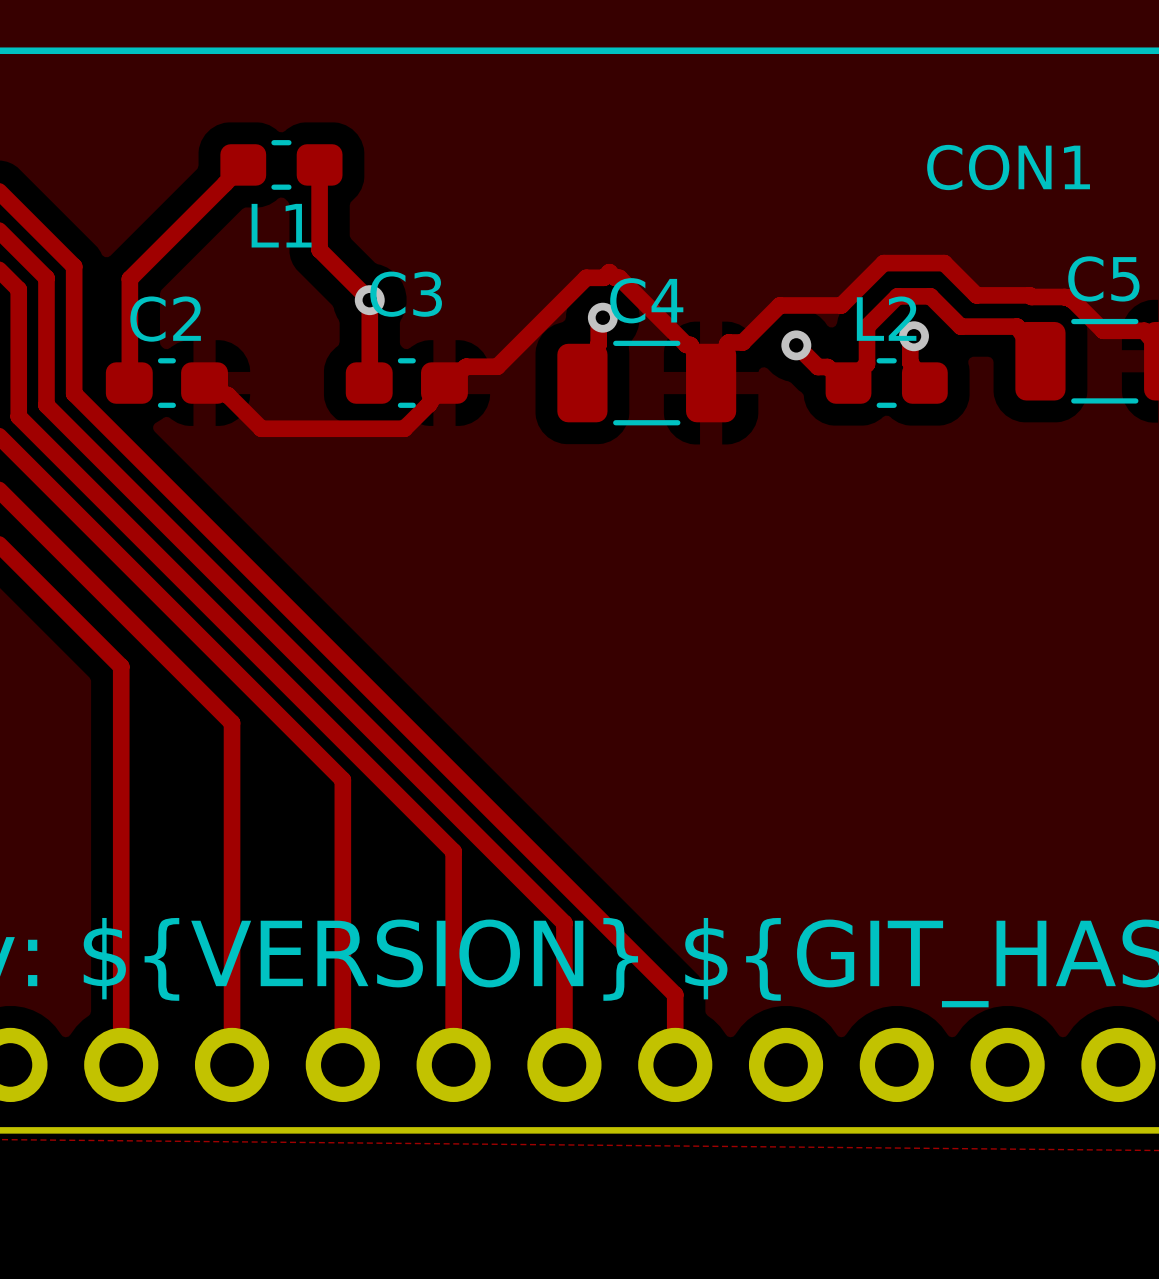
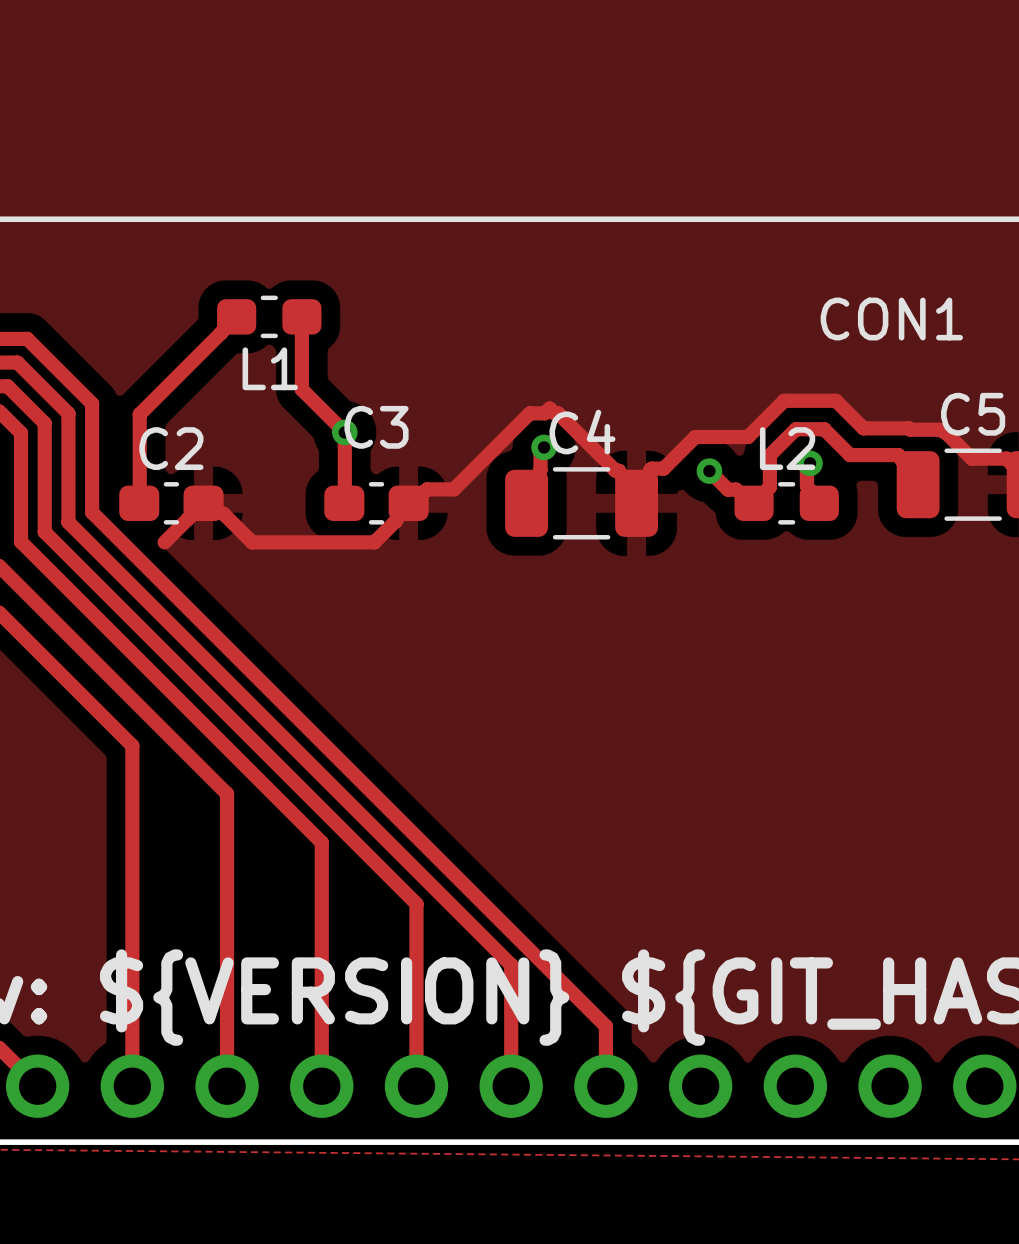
track: none -> (203, 503) (164, 542)

